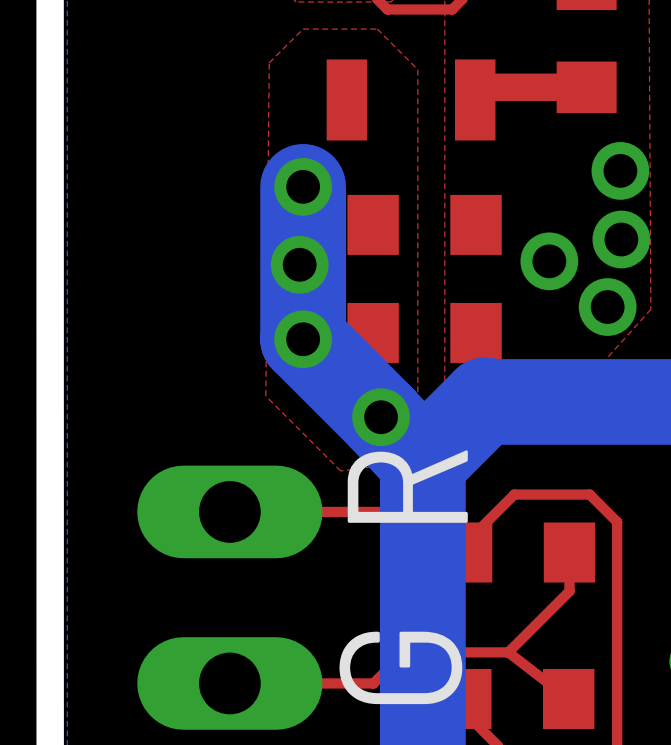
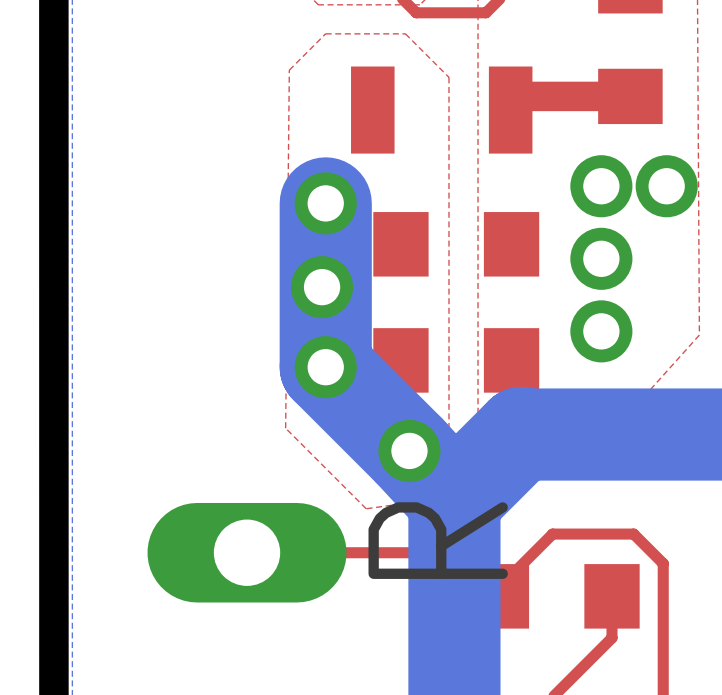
via: none -> (601, 186)
via: none -> (601, 258)
via: (621, 239) -> none
via: (549, 261) -> none
via: none -> (601, 331)
via: (607, 307) -> none

